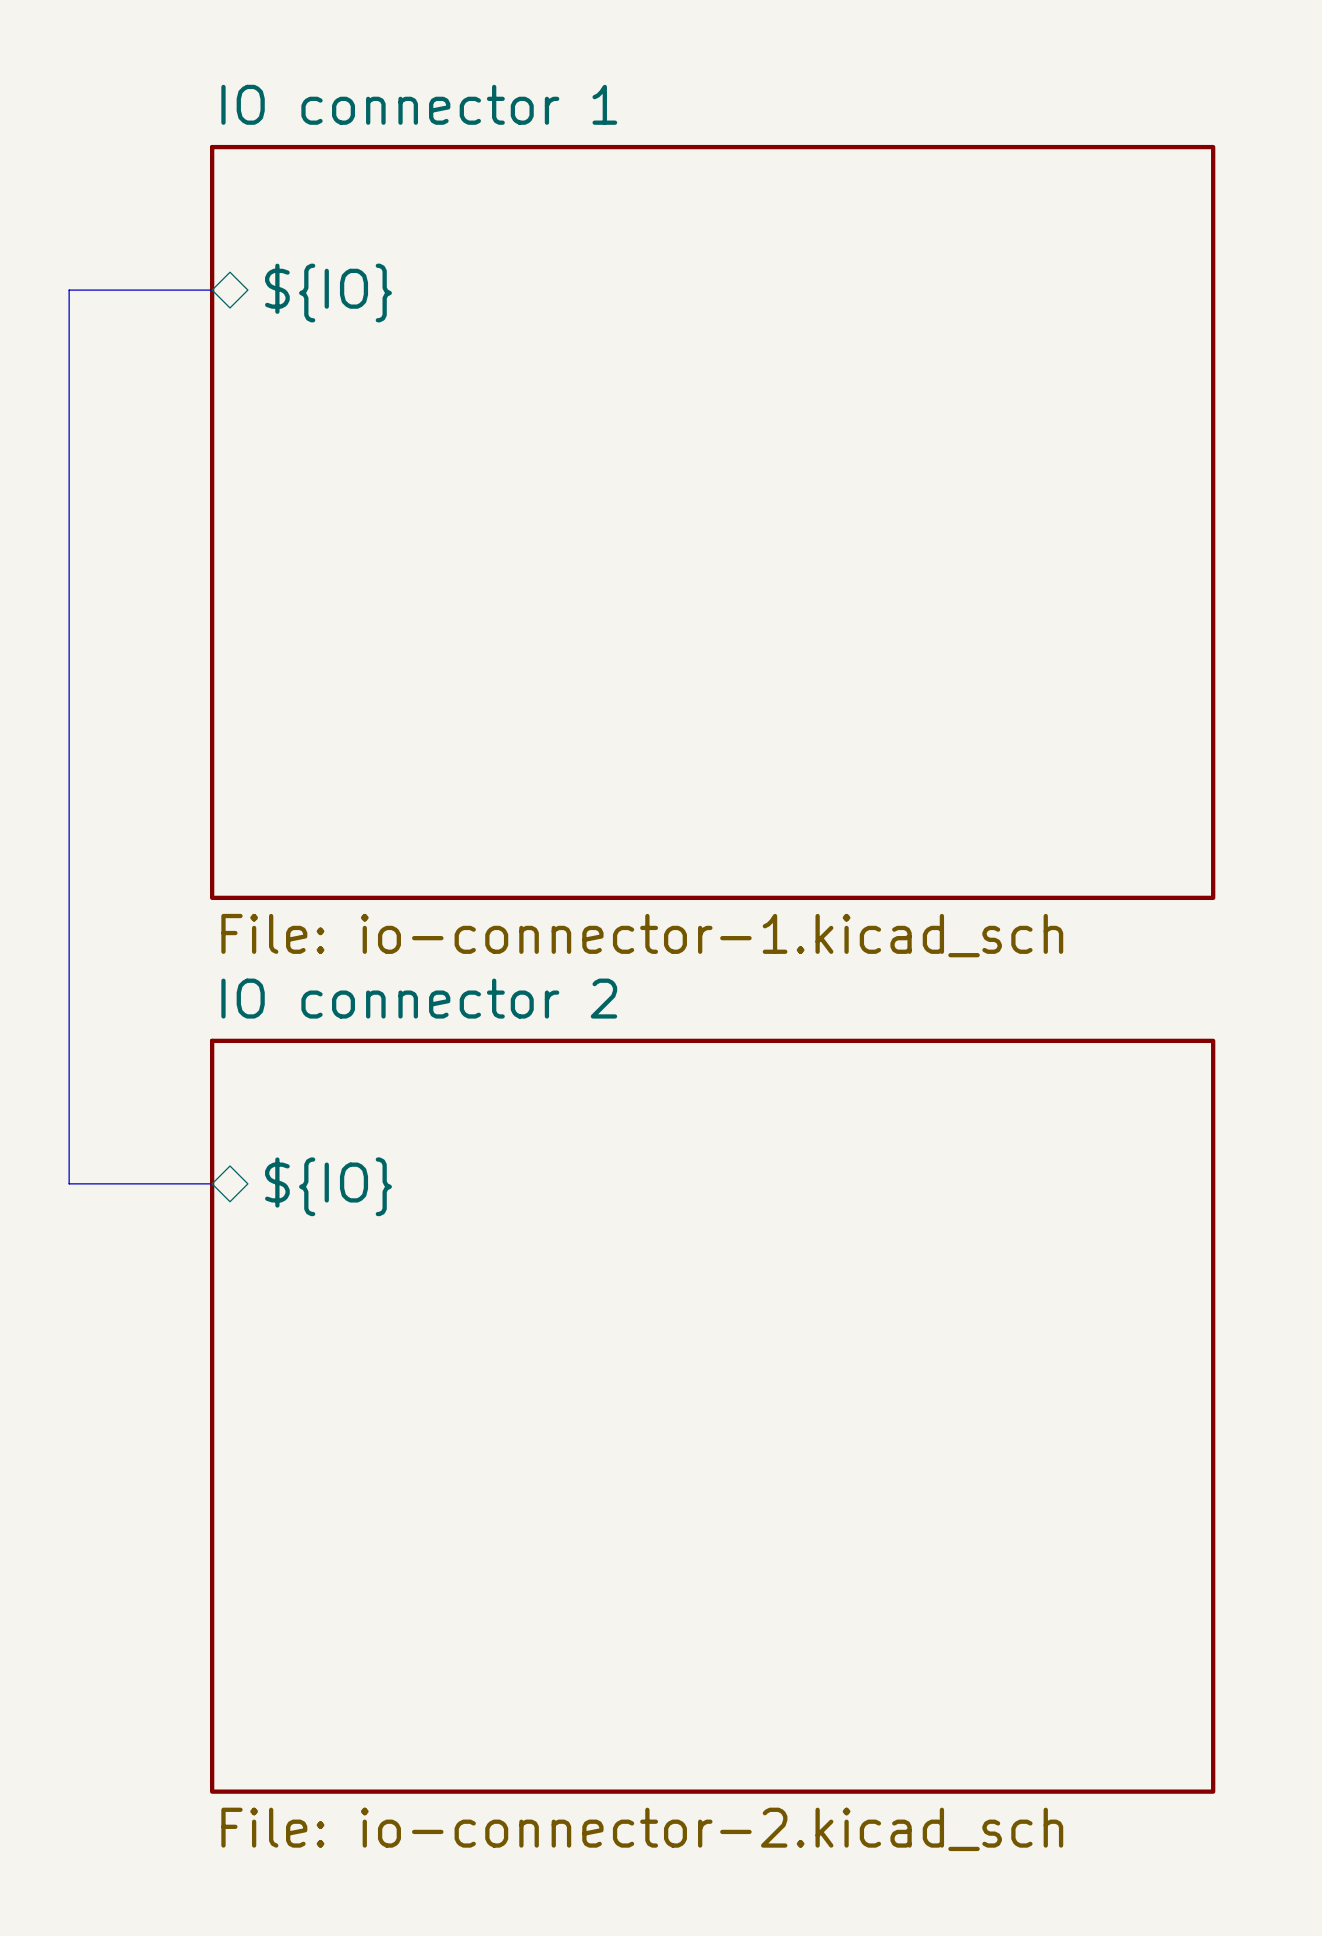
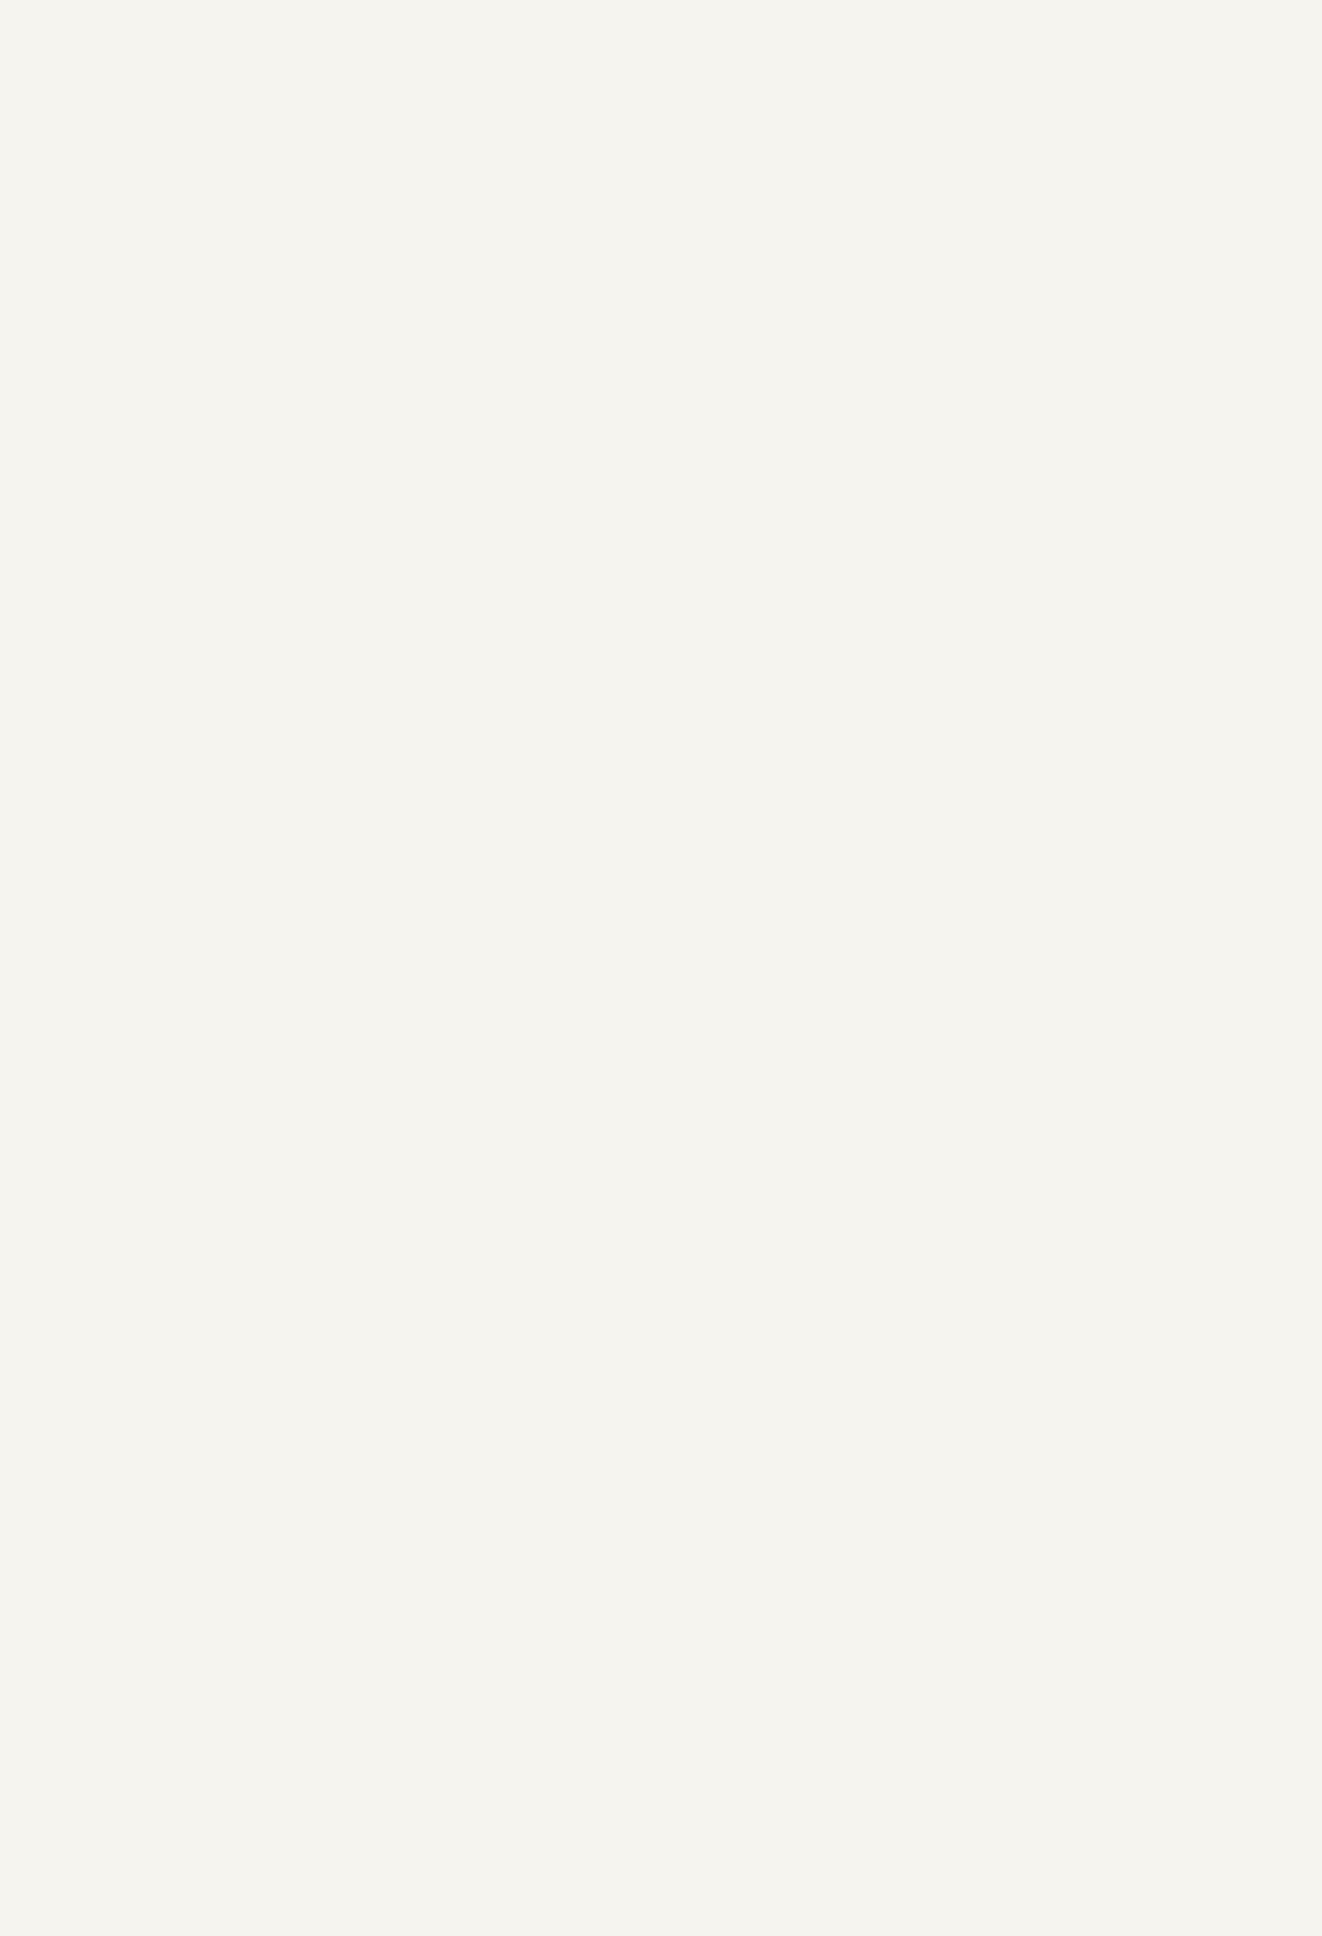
bus: (212, 290) (69, 290) (69, 1183) (212, 1183) -> none
sheet pin: ${IO} (328, 293) -> none
sheet IO connector 1: File: io-connector-1.kicad_sch (712, 522) -> none
sheet pin: ${IO} (328, 1186) -> none
sheet IO connector 2: File: io-connector-2.kicad_sch (712, 1416) -> none

